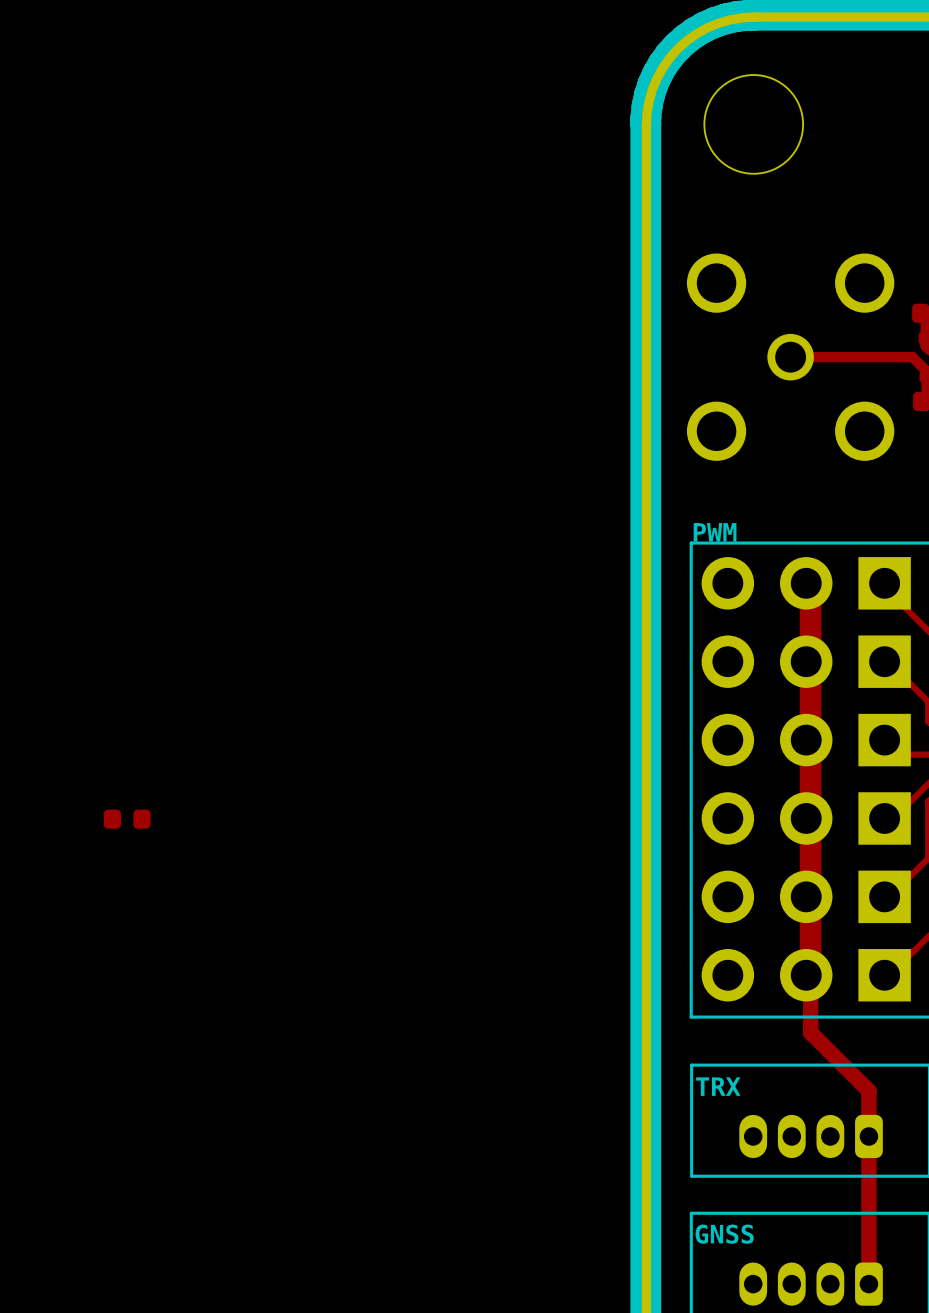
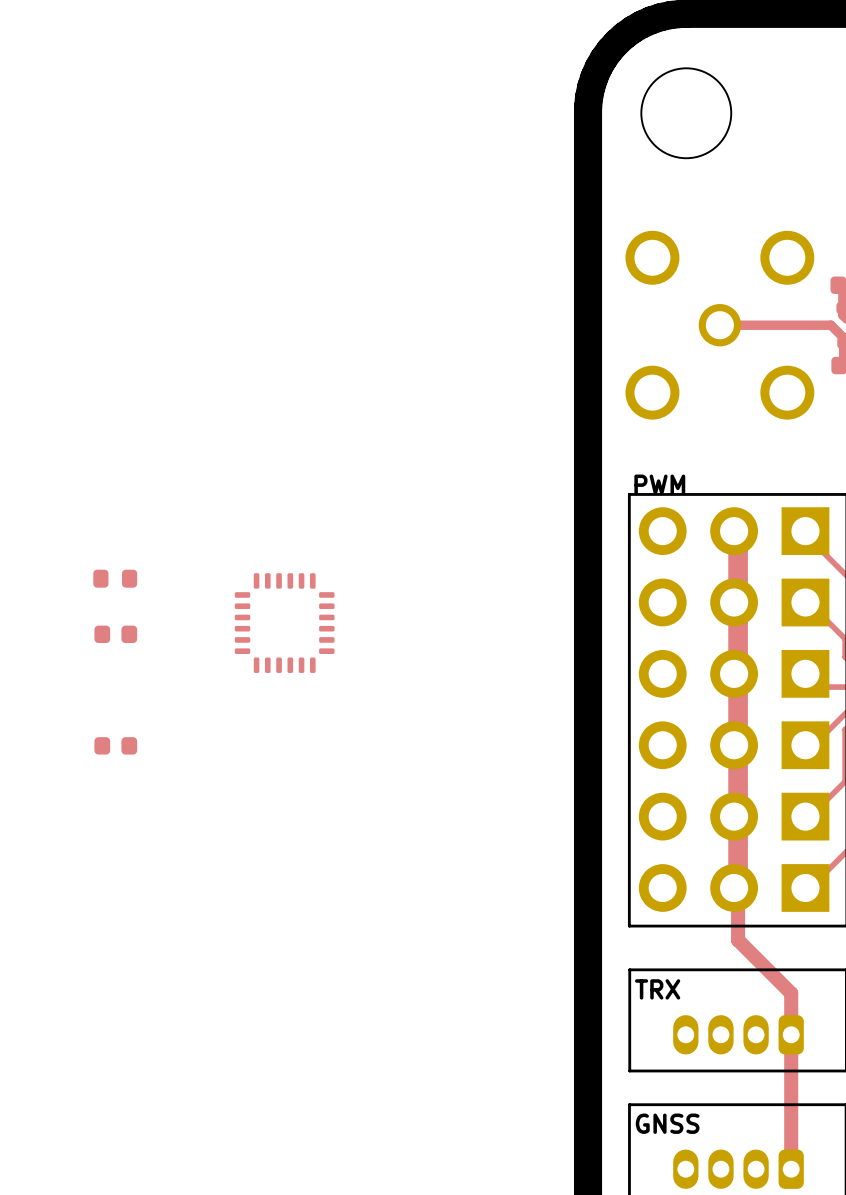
part: none -> (115, 578)
part: none -> (284, 623)
part: none -> (115, 634)

